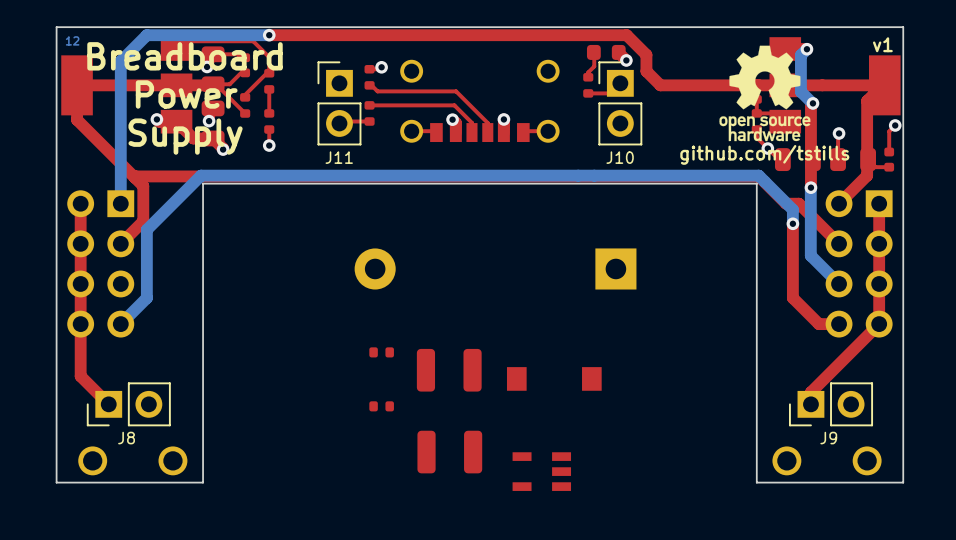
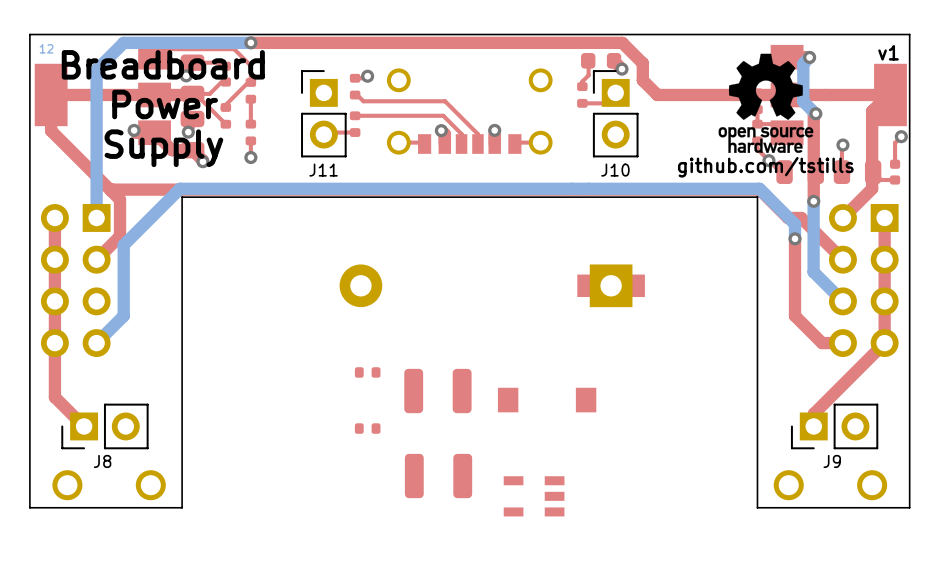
part: none -> (611, 285)

